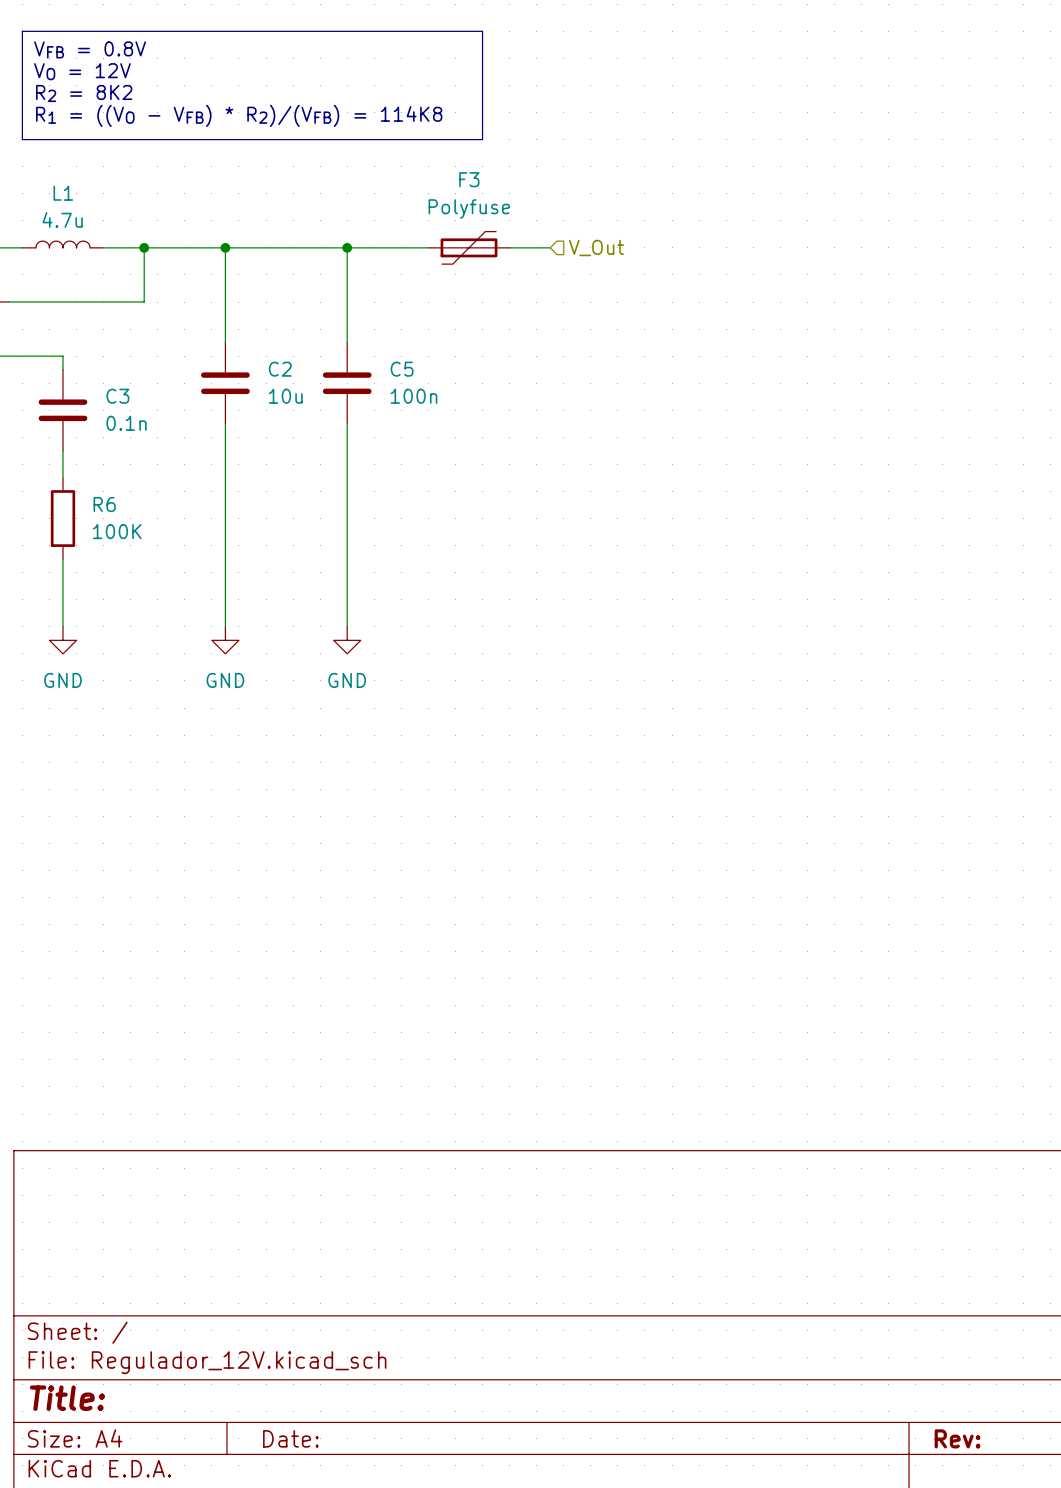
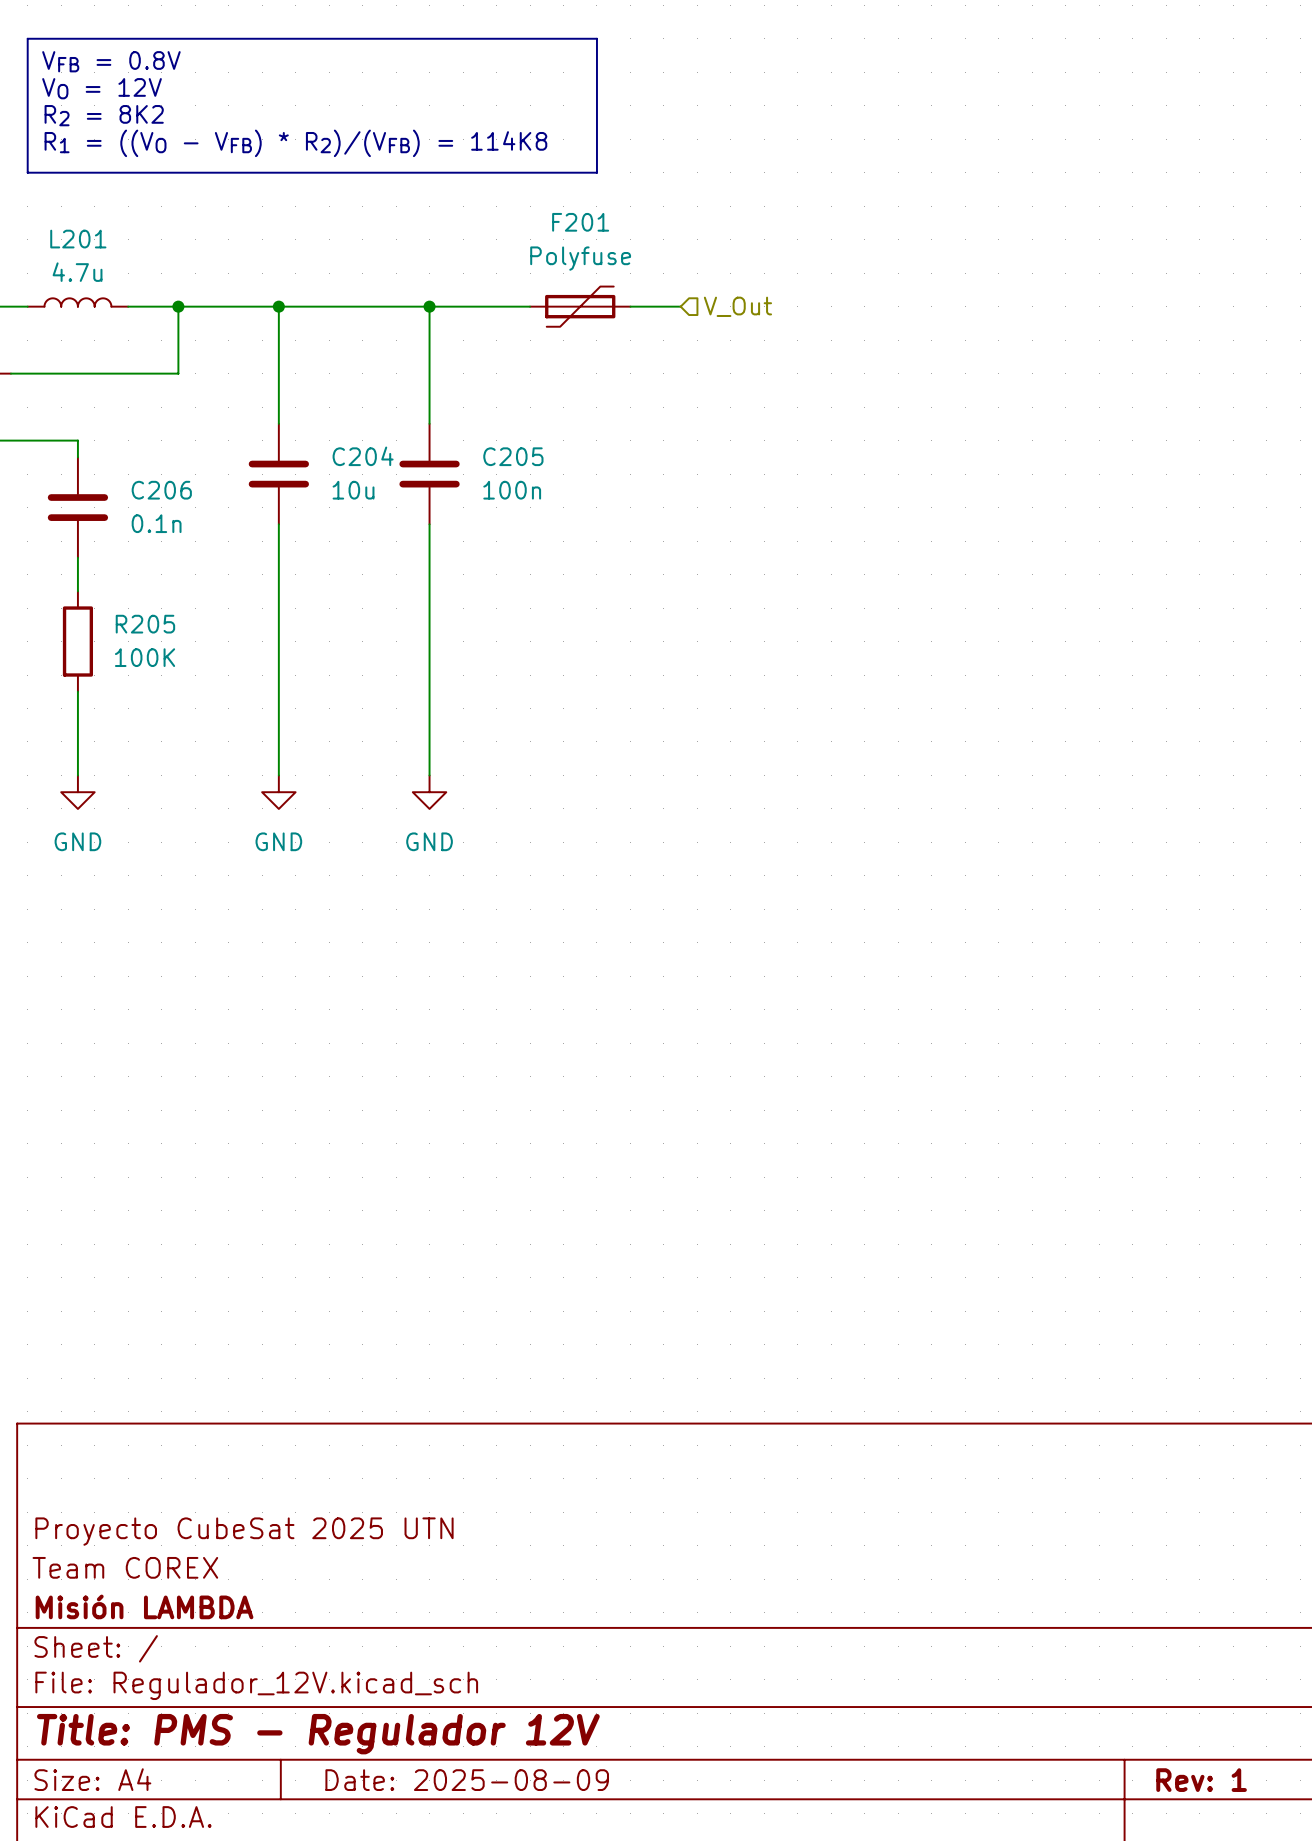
F3 name: F3 (469, 179) -> F201 (580, 222)
L1 name: L1 (63, 193) -> L201 (78, 239)
C2 name: C2 (280, 369) -> C204 (363, 456)
C5 name: C5 (402, 369) -> C205 (513, 456)
C3 name: C3 (117, 396) -> C206 (161, 490)
R6 name: R6 (104, 504) -> R205 (145, 624)
title block: none -> Proyecto CubeSat 2025 UTN (244, 1531)
title block: none -> Team COREX (125, 1567)
title block: none -> Misión LAMBDA (144, 1606)
title block: Title: (67, 1398) -> Title: PMS - Regulador 12V (318, 1734)
title block: Date: (290, 1438) -> Date: 2025-08-09 (467, 1780)
title block: Rev: (957, 1438) -> Rev: 1 (1201, 1780)

